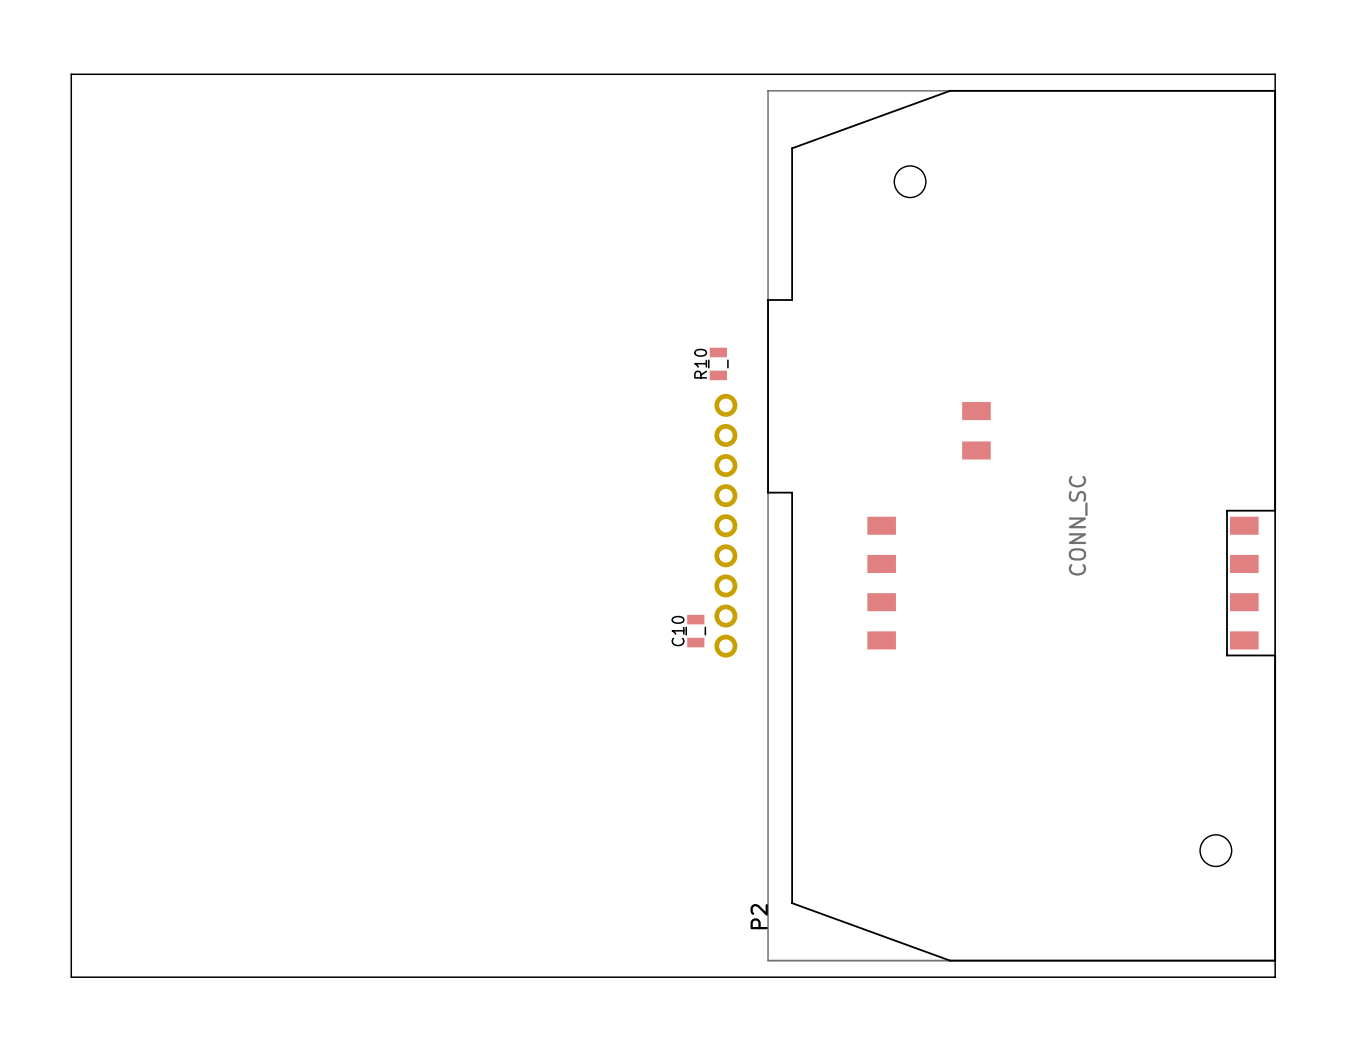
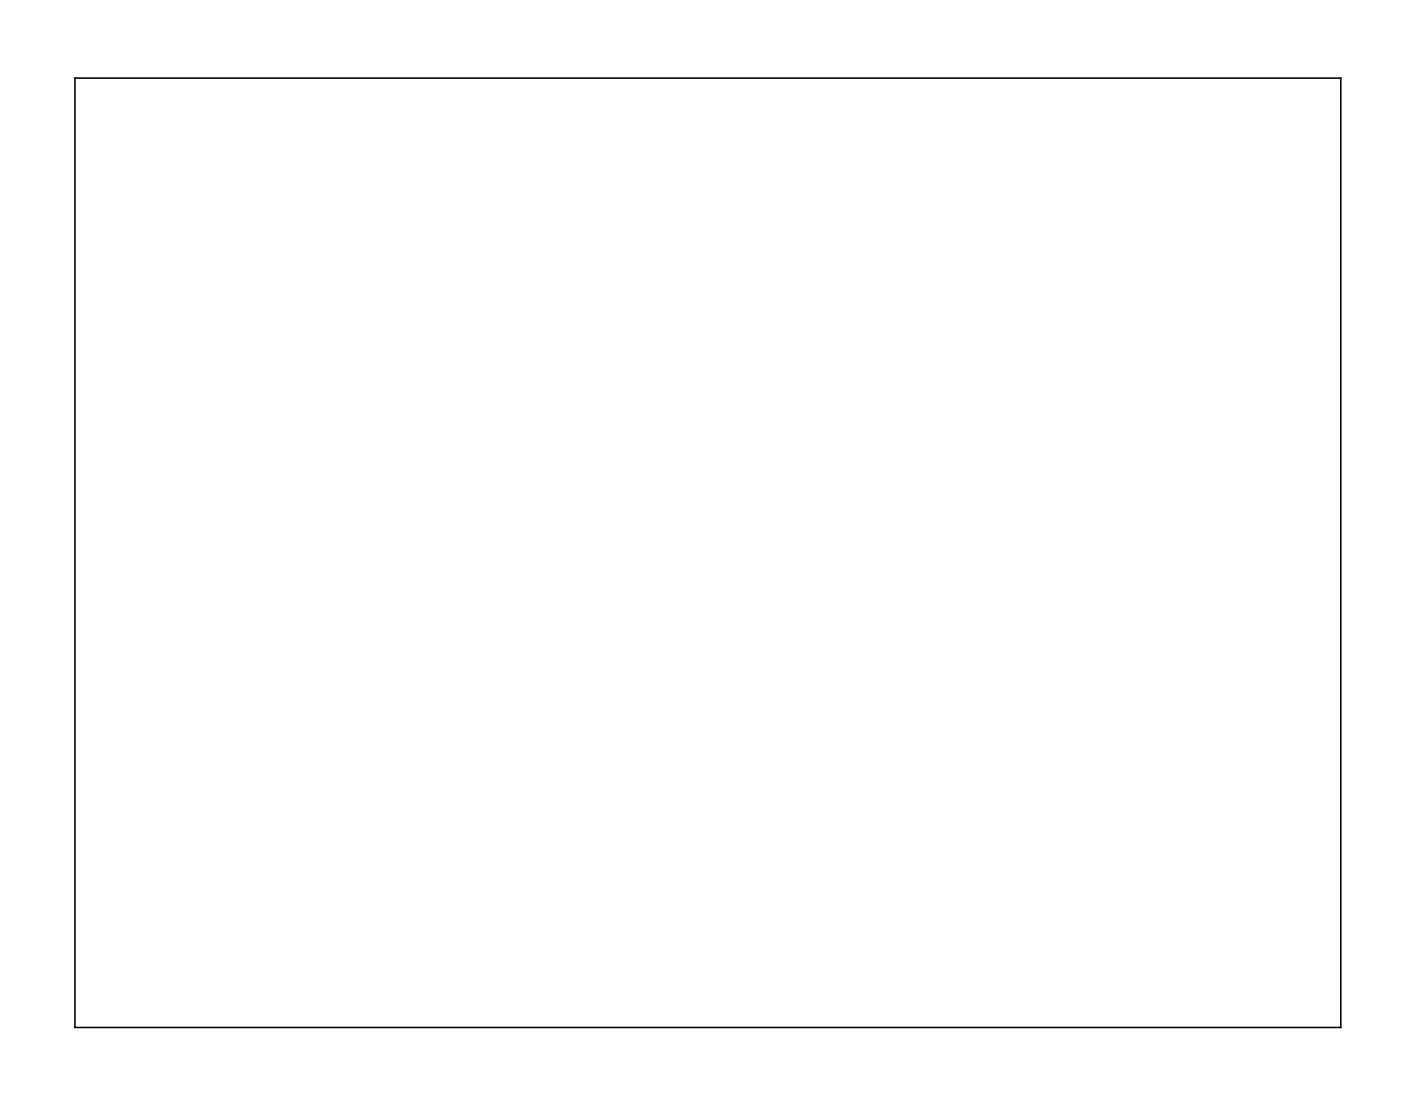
R10: (718, 363) -> none
part: (725, 405) -> none
part: (725, 435) -> none
part: (725, 465) -> none
part: (725, 495) -> none
part: (725, 525) -> none
P2: CONN_SC (1021, 525) -> none
part: (725, 555) -> none
part: (725, 585) -> none
part: (725, 616) -> none
C10: (695, 631) -> none
part: (725, 646) -> none

